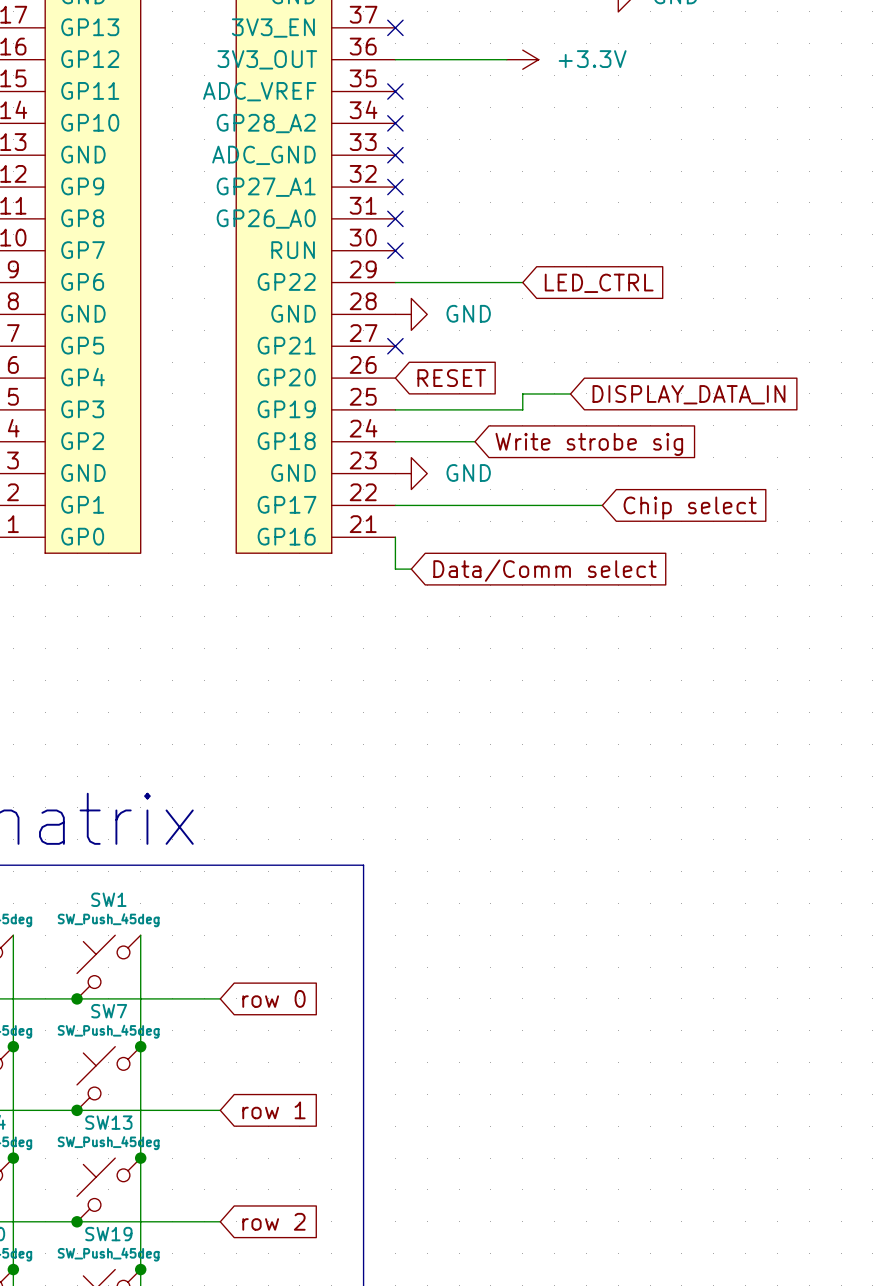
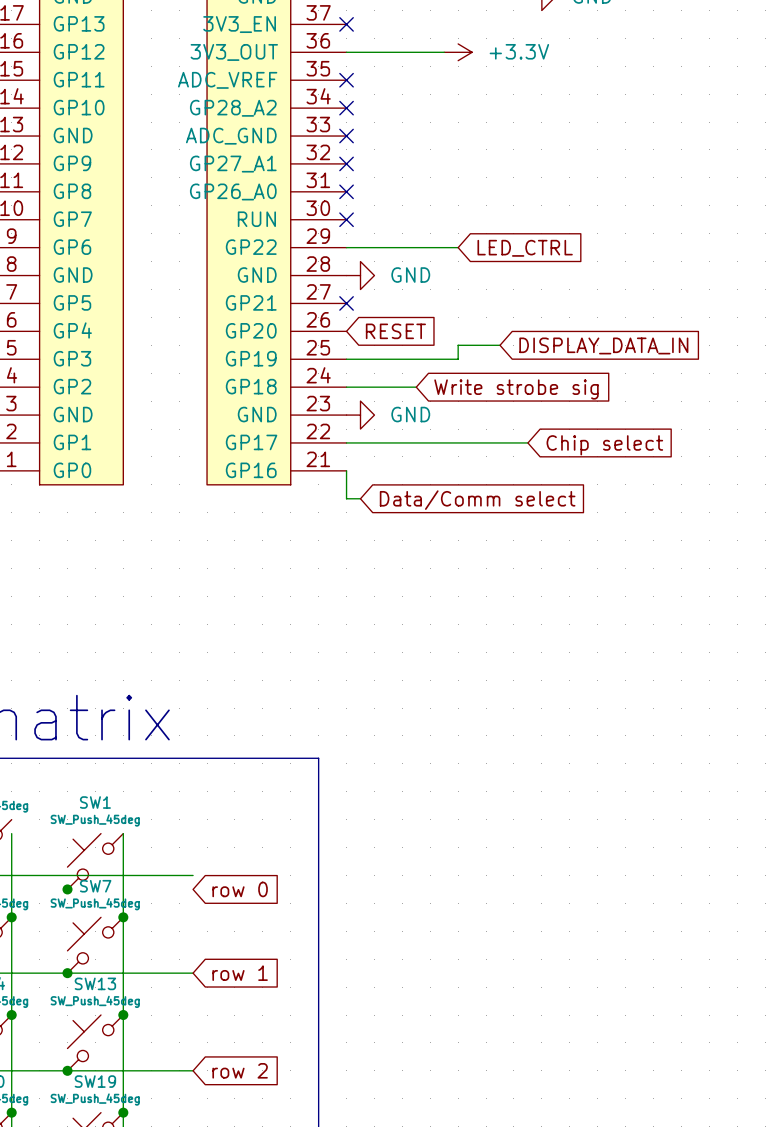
wire: (13, 935) (13, 951) -> none
wire: (140, 935) (140, 951) -> none
SW1 position: (108, 967) -> (95, 861)
junction position: (77, 998) -> (67, 889)
global label position: row 0 (273, 998) -> row 0 (240, 889)

